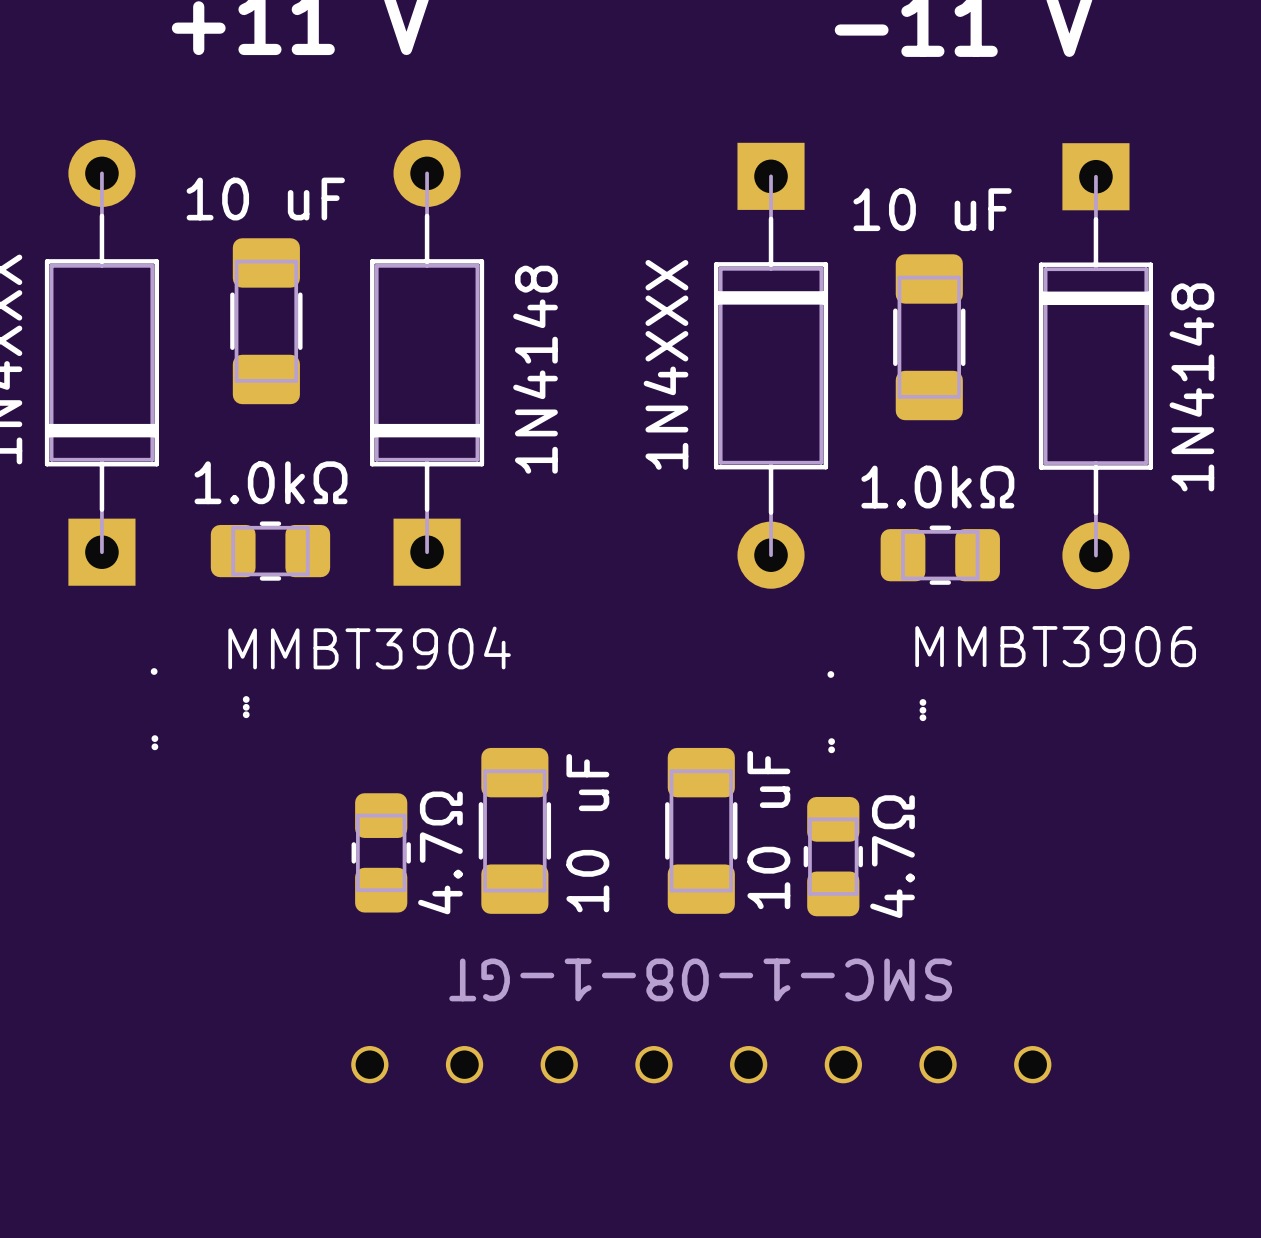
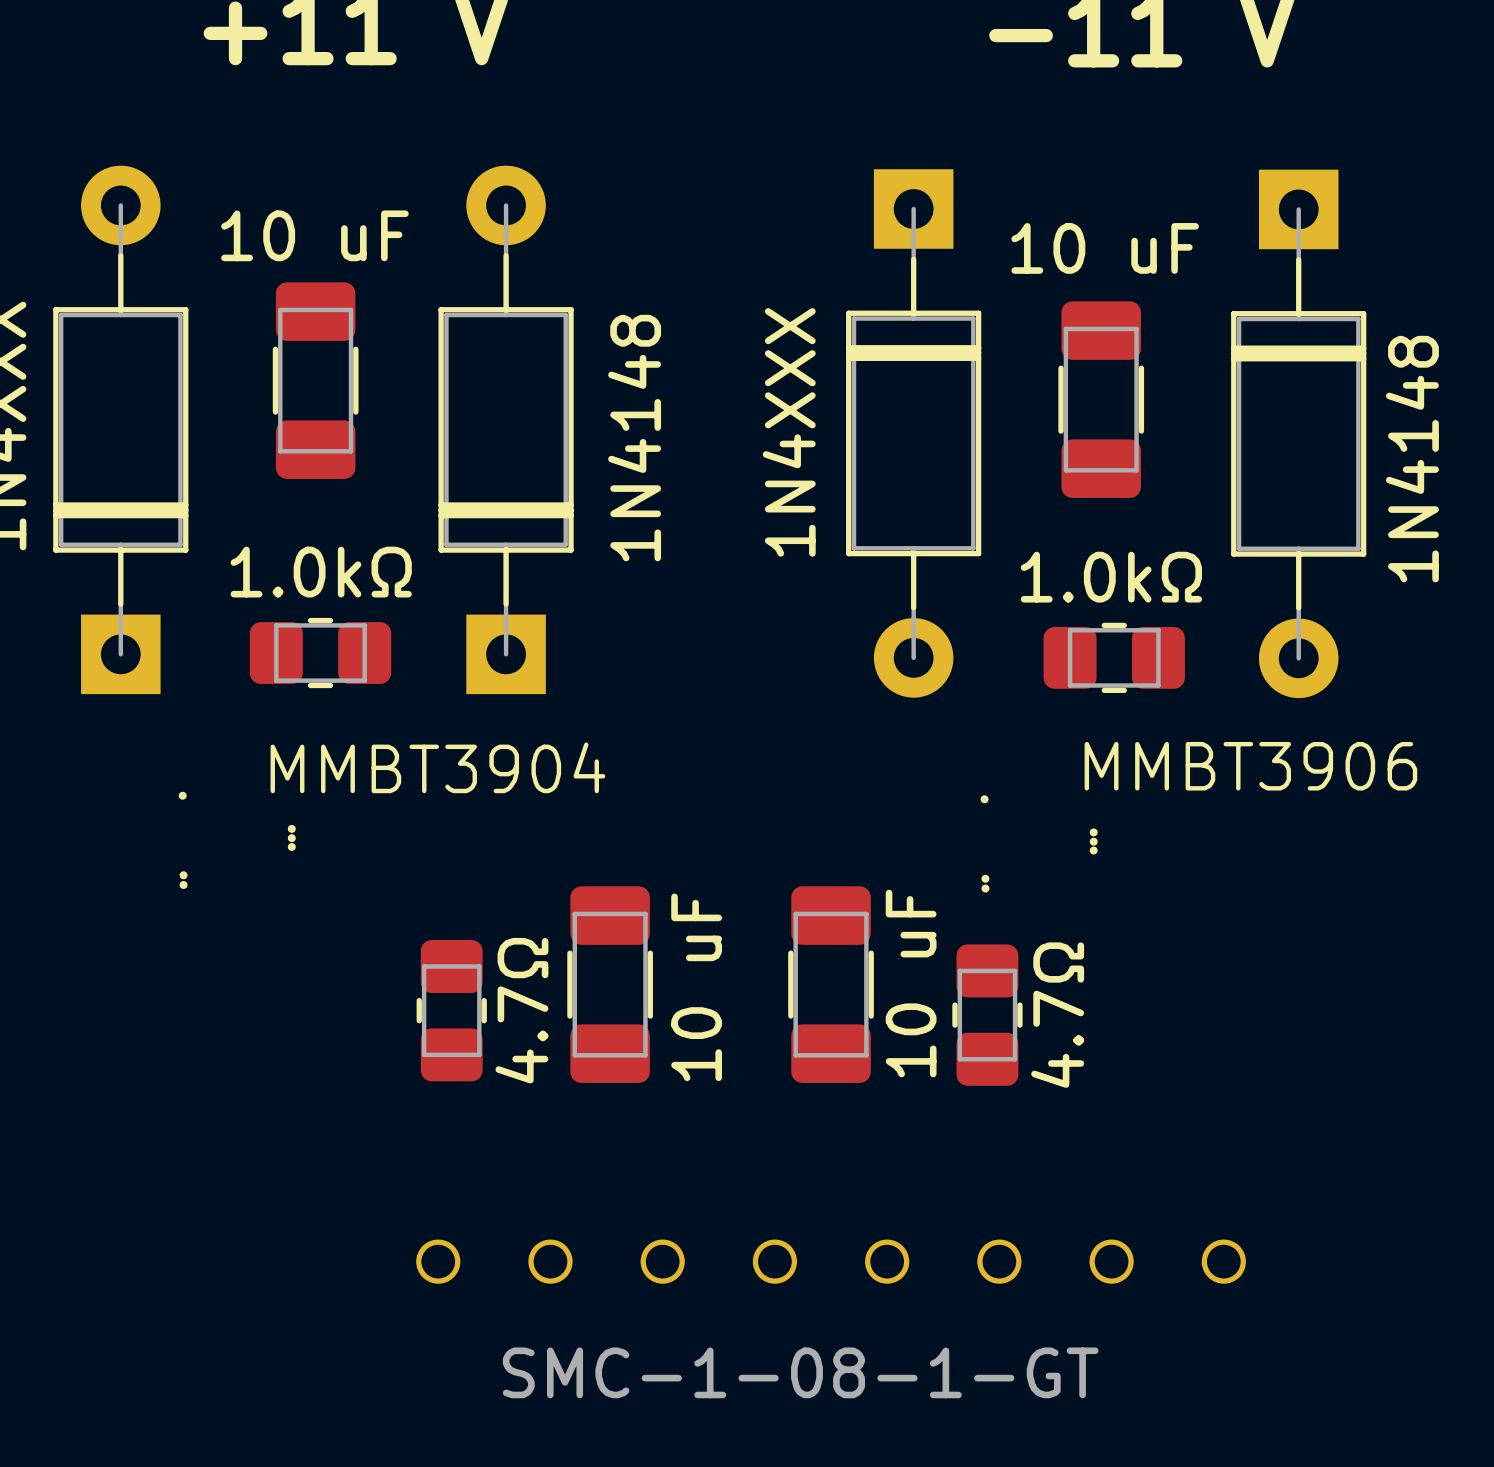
part value rotation: 0° (700, 979) -> 180° (800, 1372)

